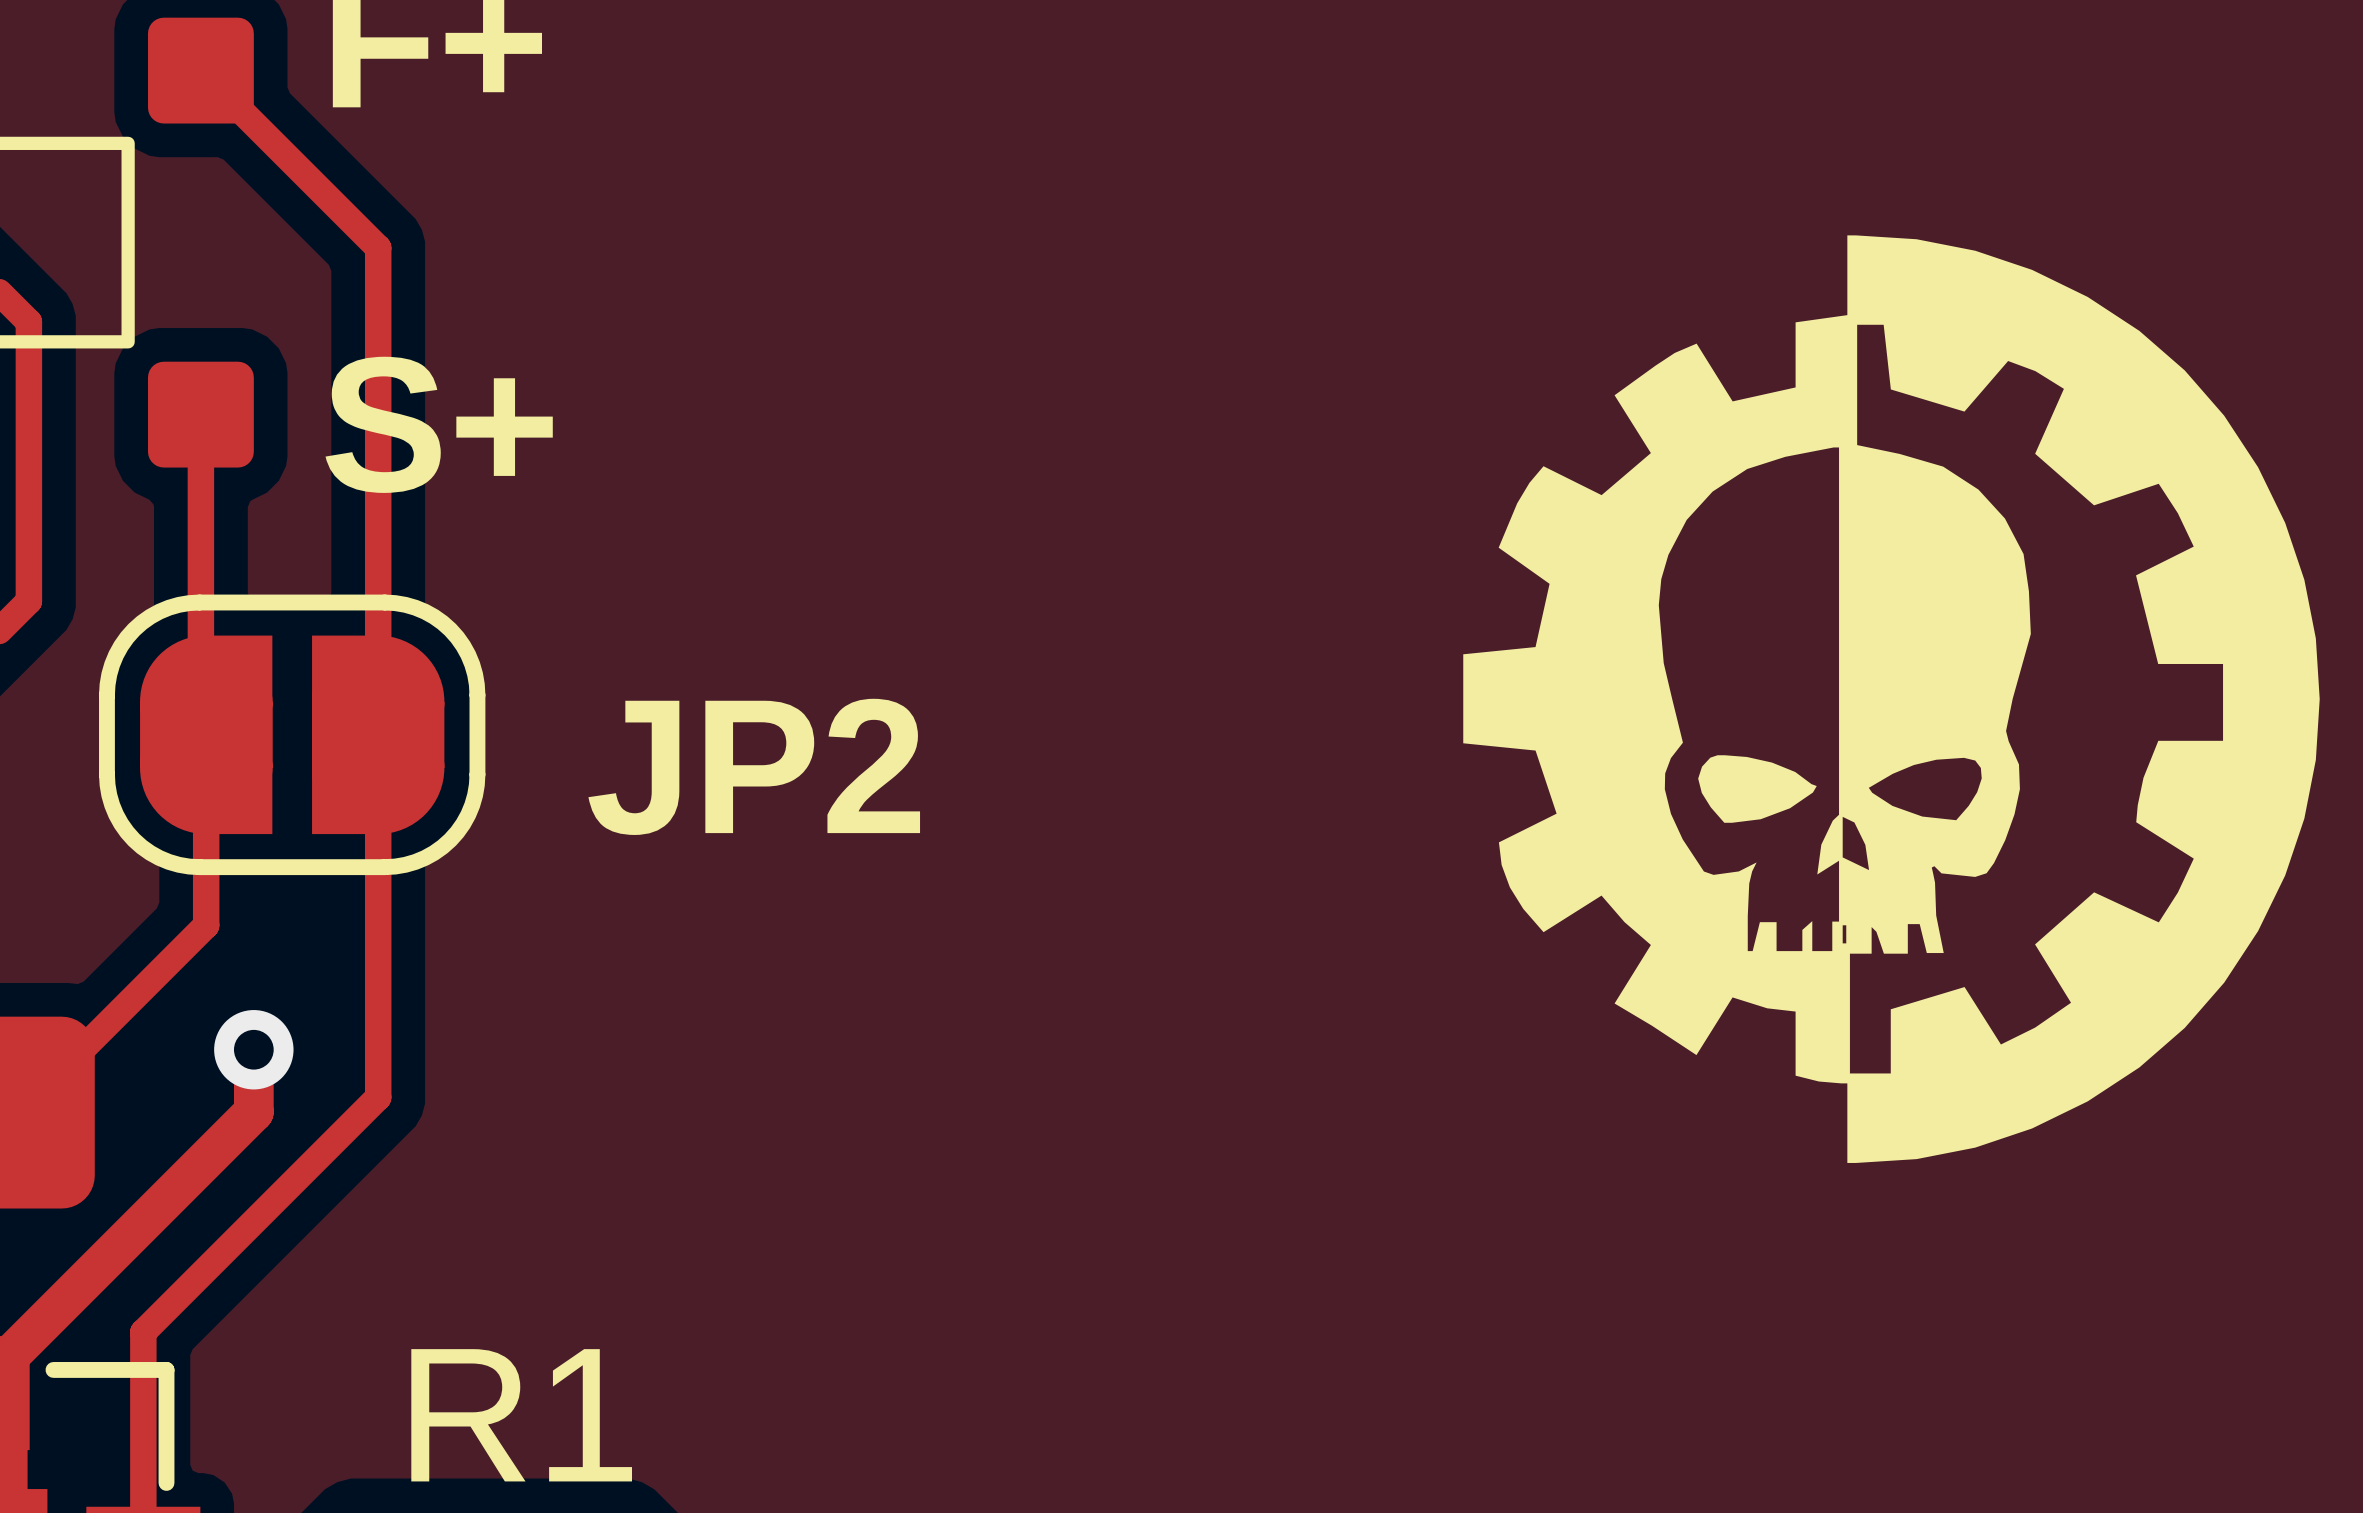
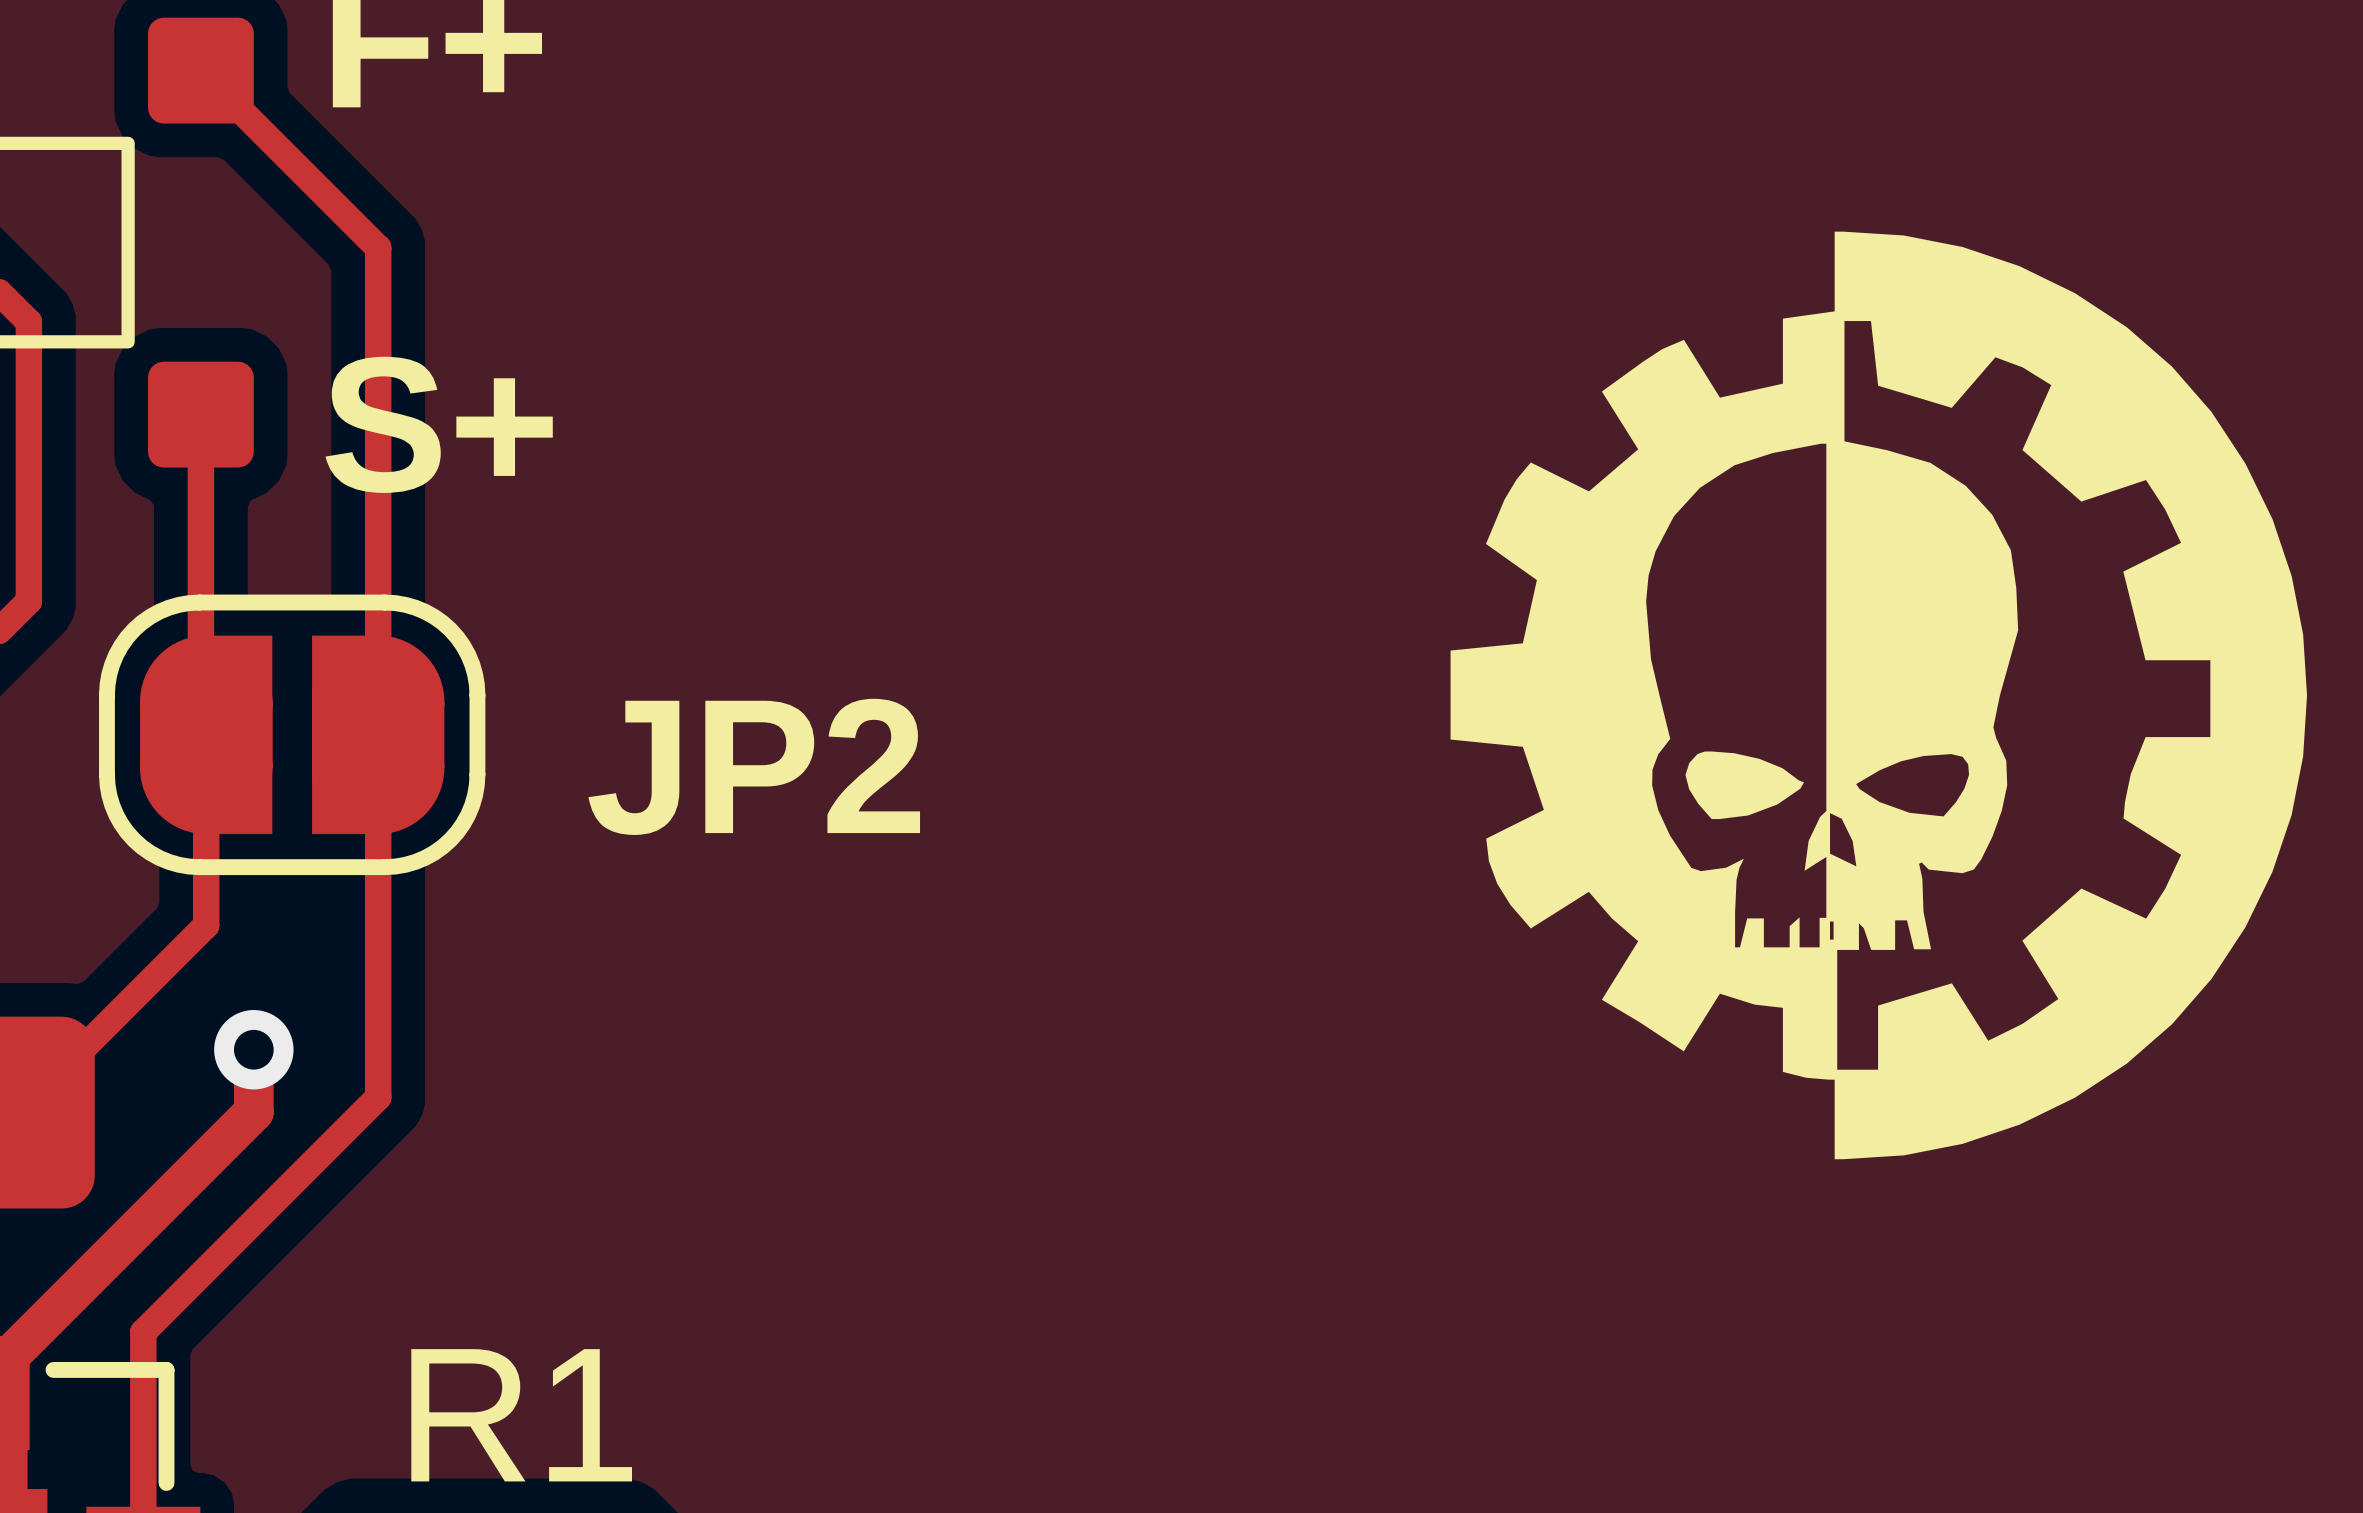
drawing position: (1891, 699) -> (1878, 695)
drawing position: (1757, 789) -> (1744, 785)

